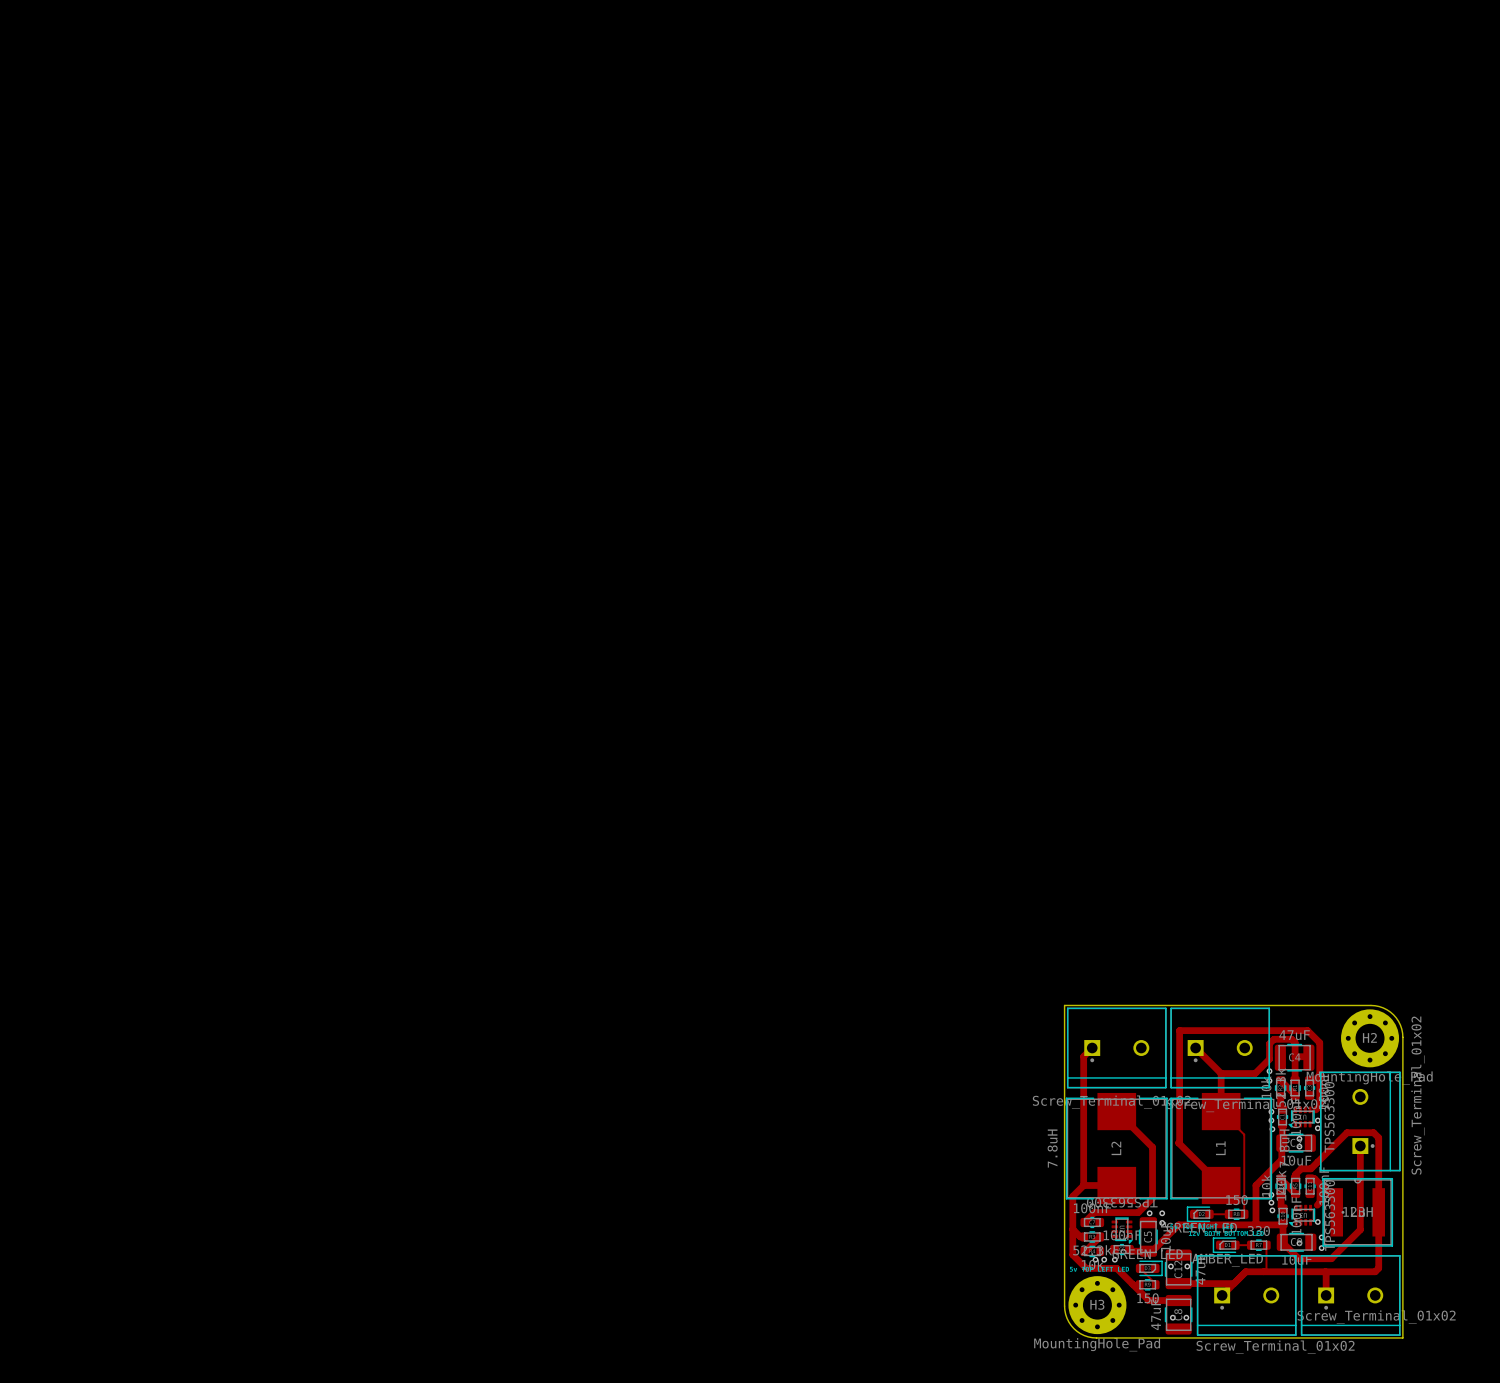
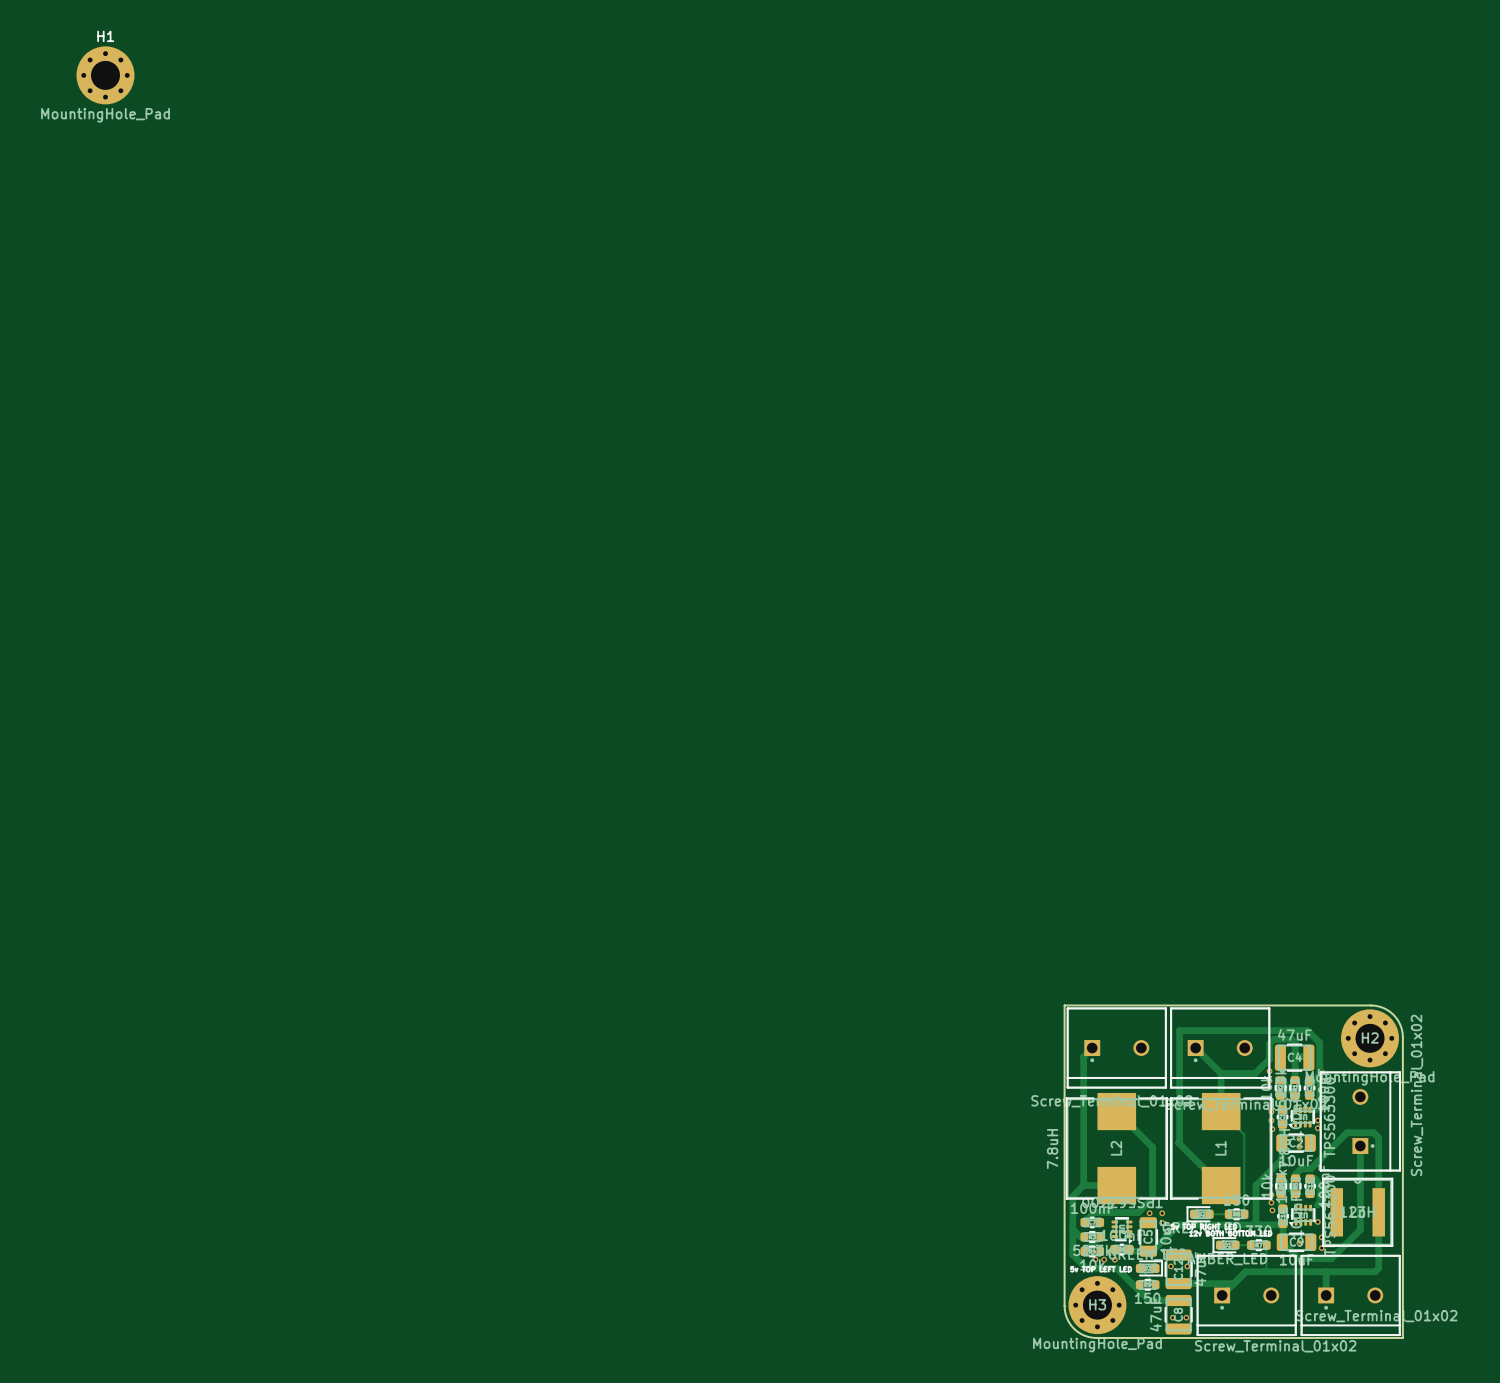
H1: none -> MountingHole_Pad (105, 75)

